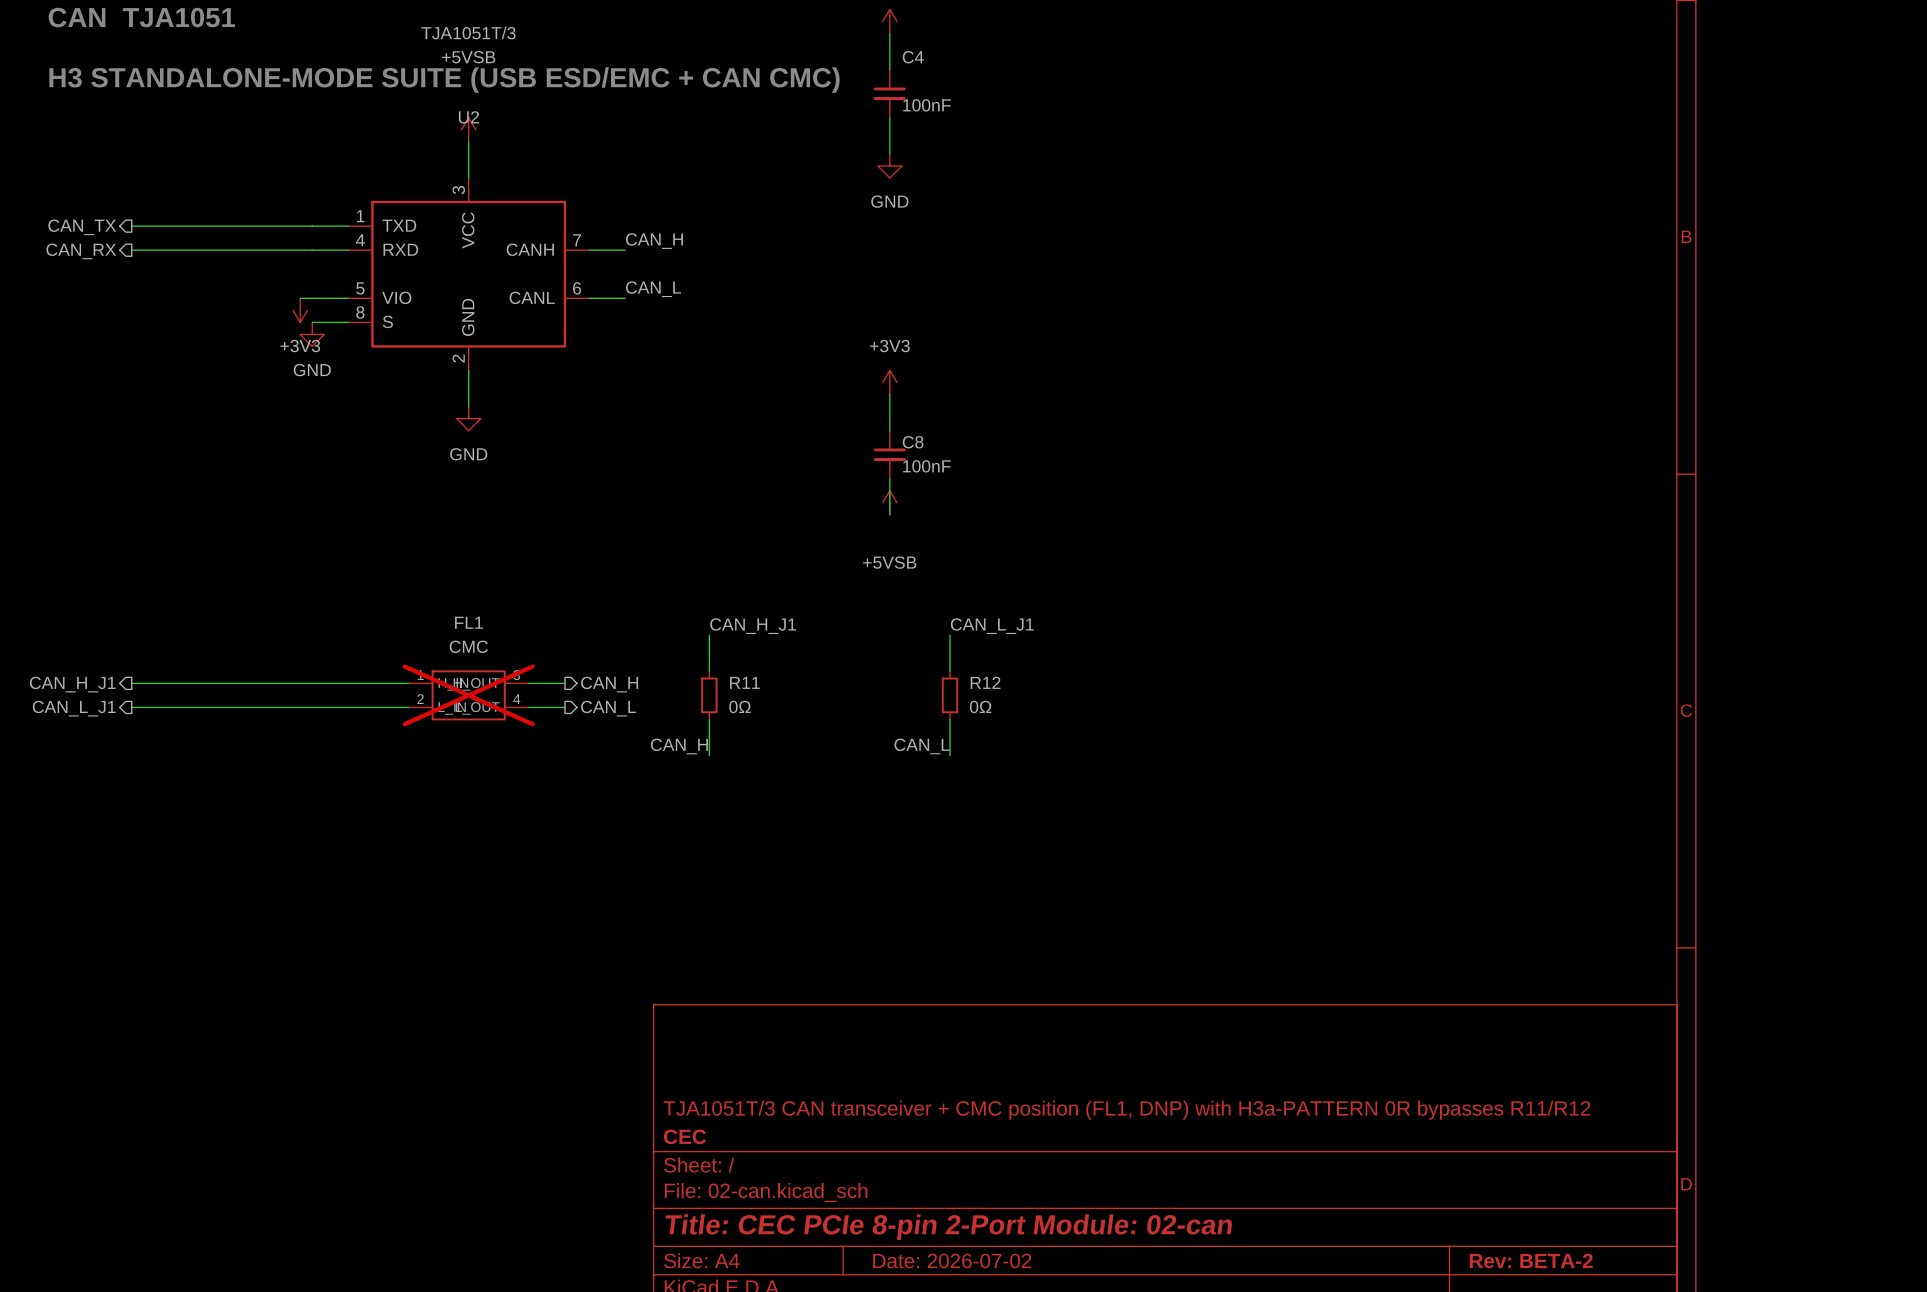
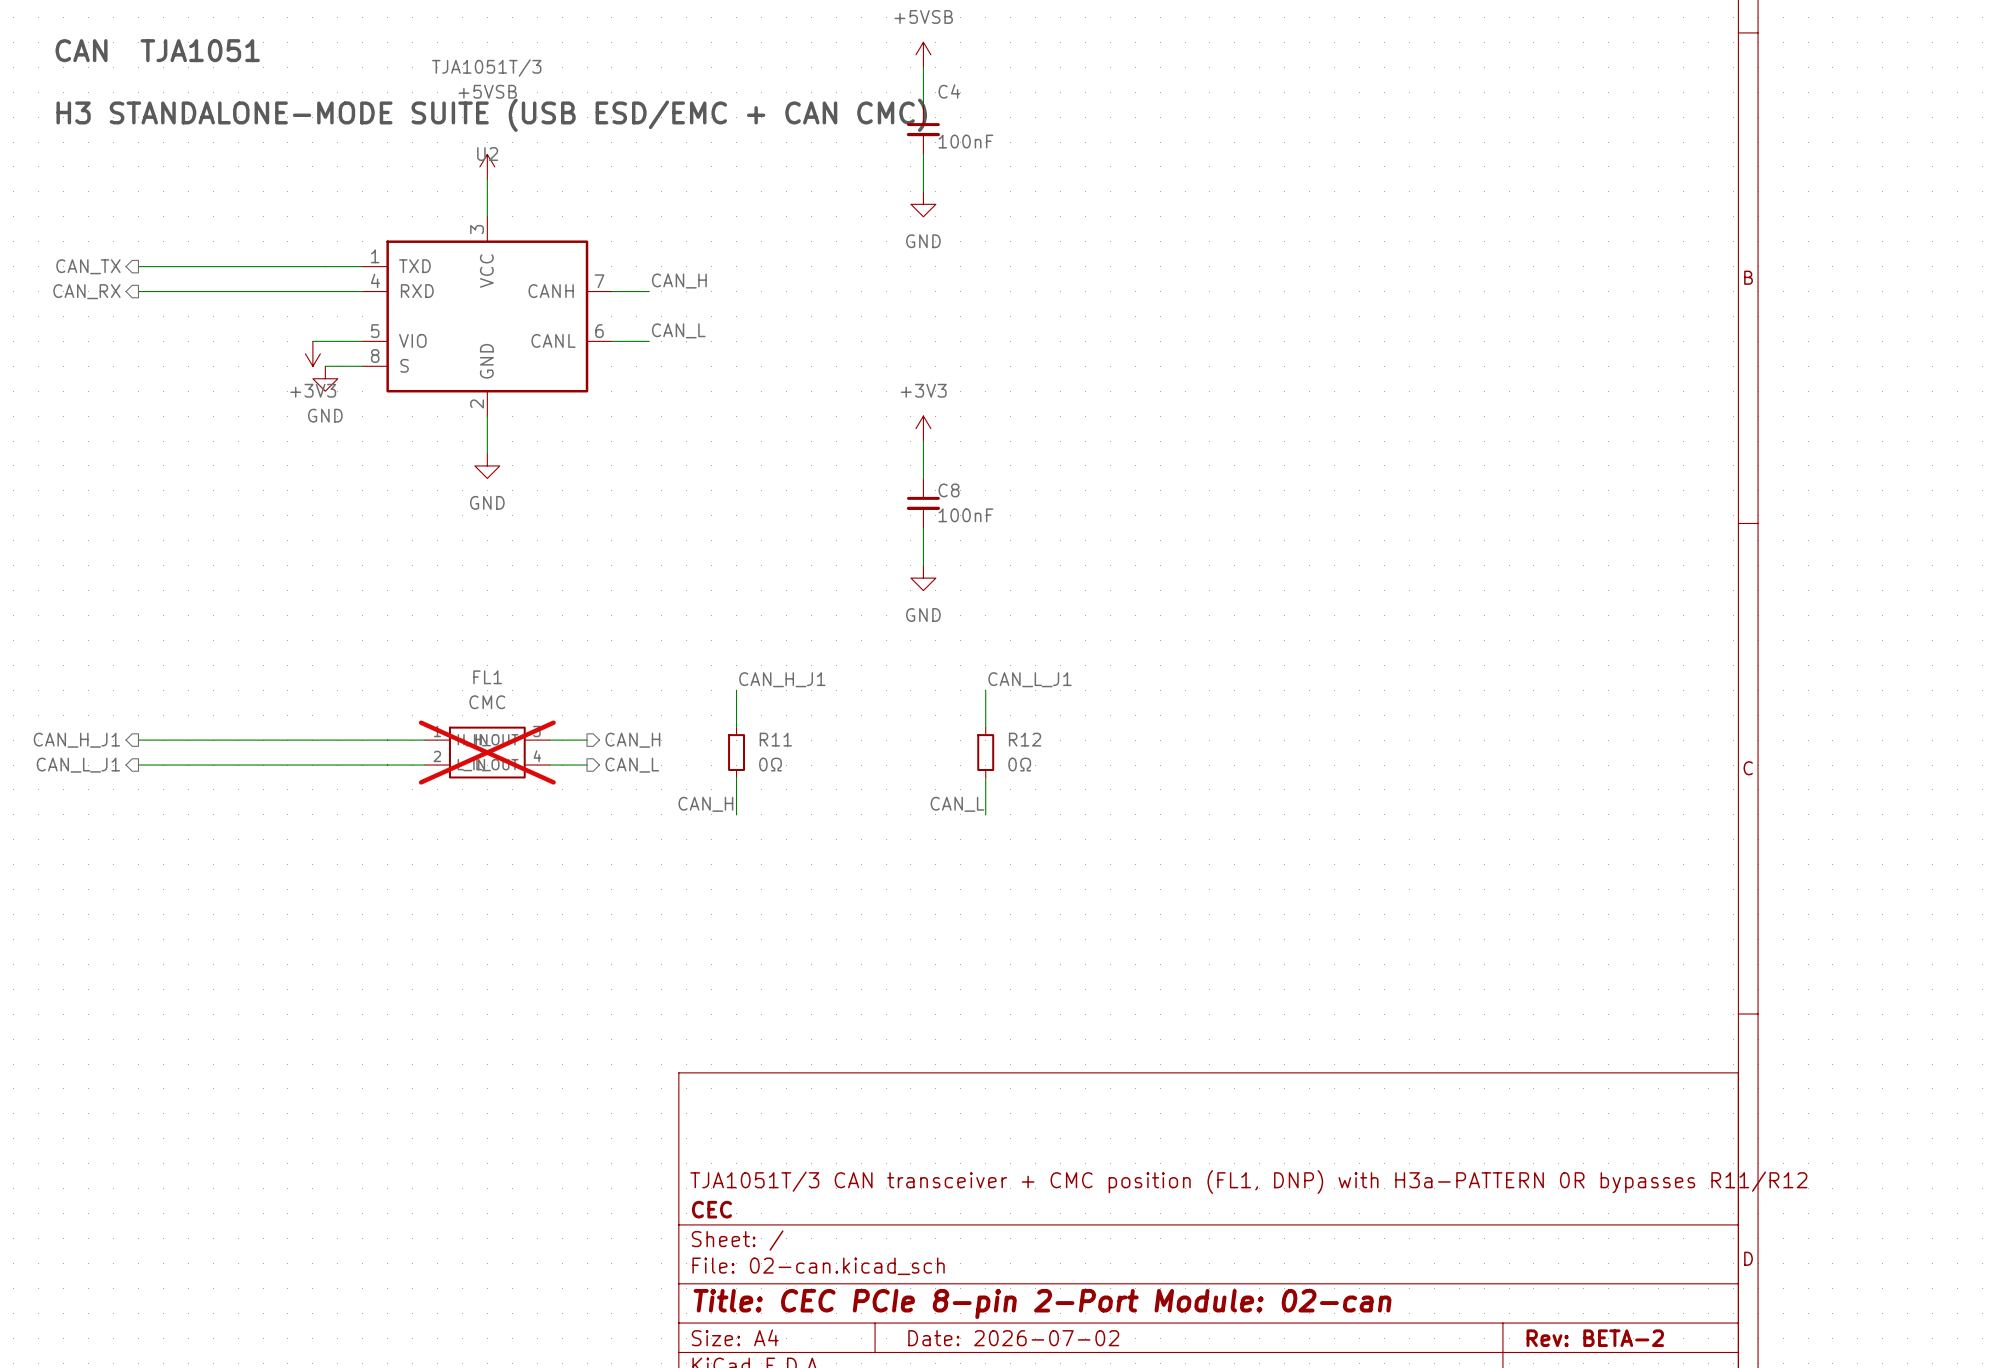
power symbol: +5VSB (889, 502) -> none
power symbol: none -> GND (923, 578)

